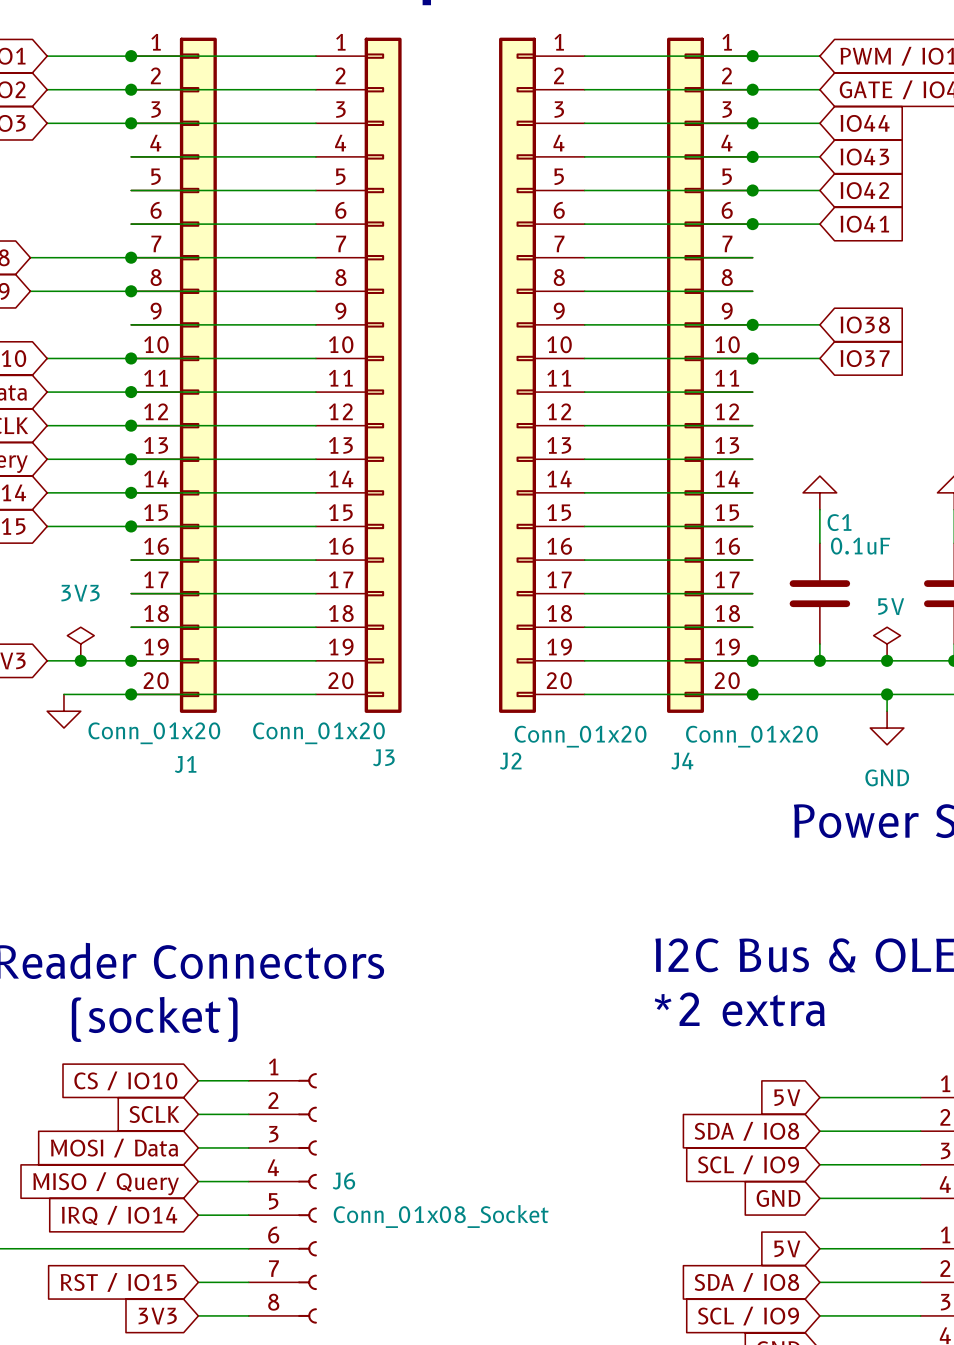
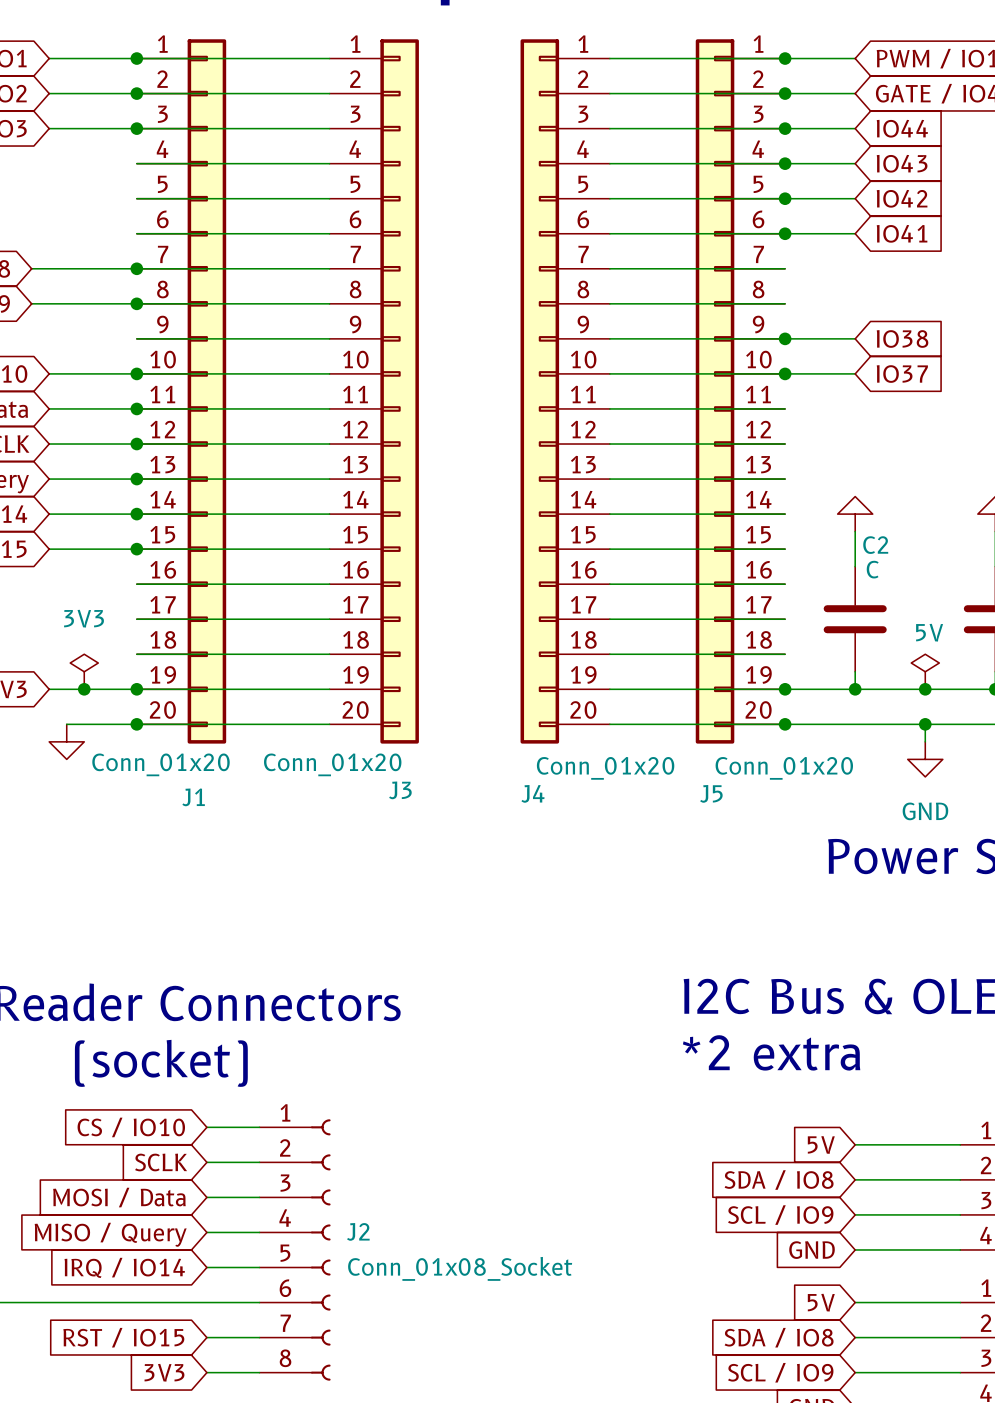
C1 name: C1 (839, 522) -> C2 (875, 545)
C1 value: 0.1uF (860, 546) -> C (872, 569)
J2 name: J2 (510, 761) -> J4 (532, 793)
J4 name: J4 (682, 761) -> J5 (711, 793)
J6 name: J6 (343, 1181) -> J2 (358, 1231)

